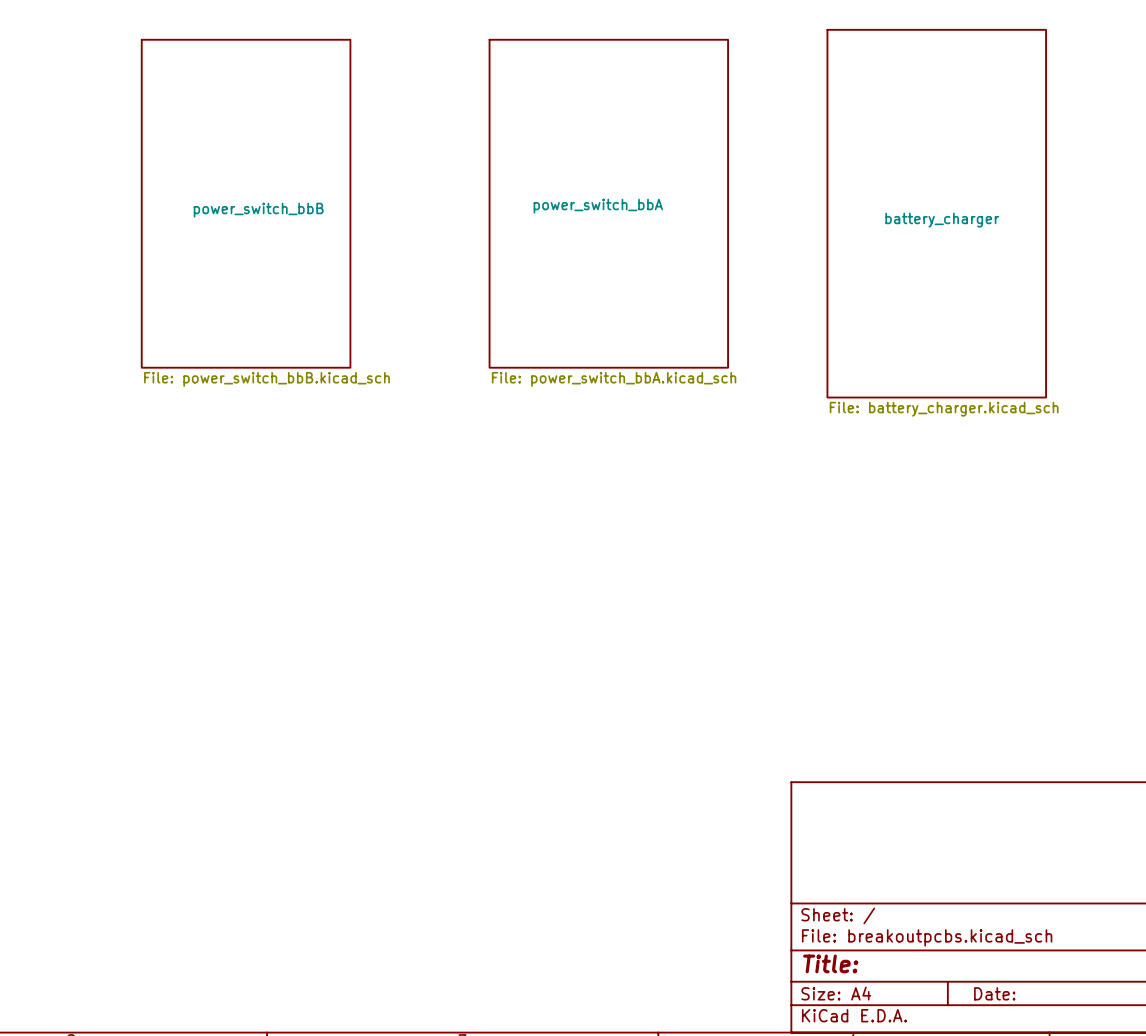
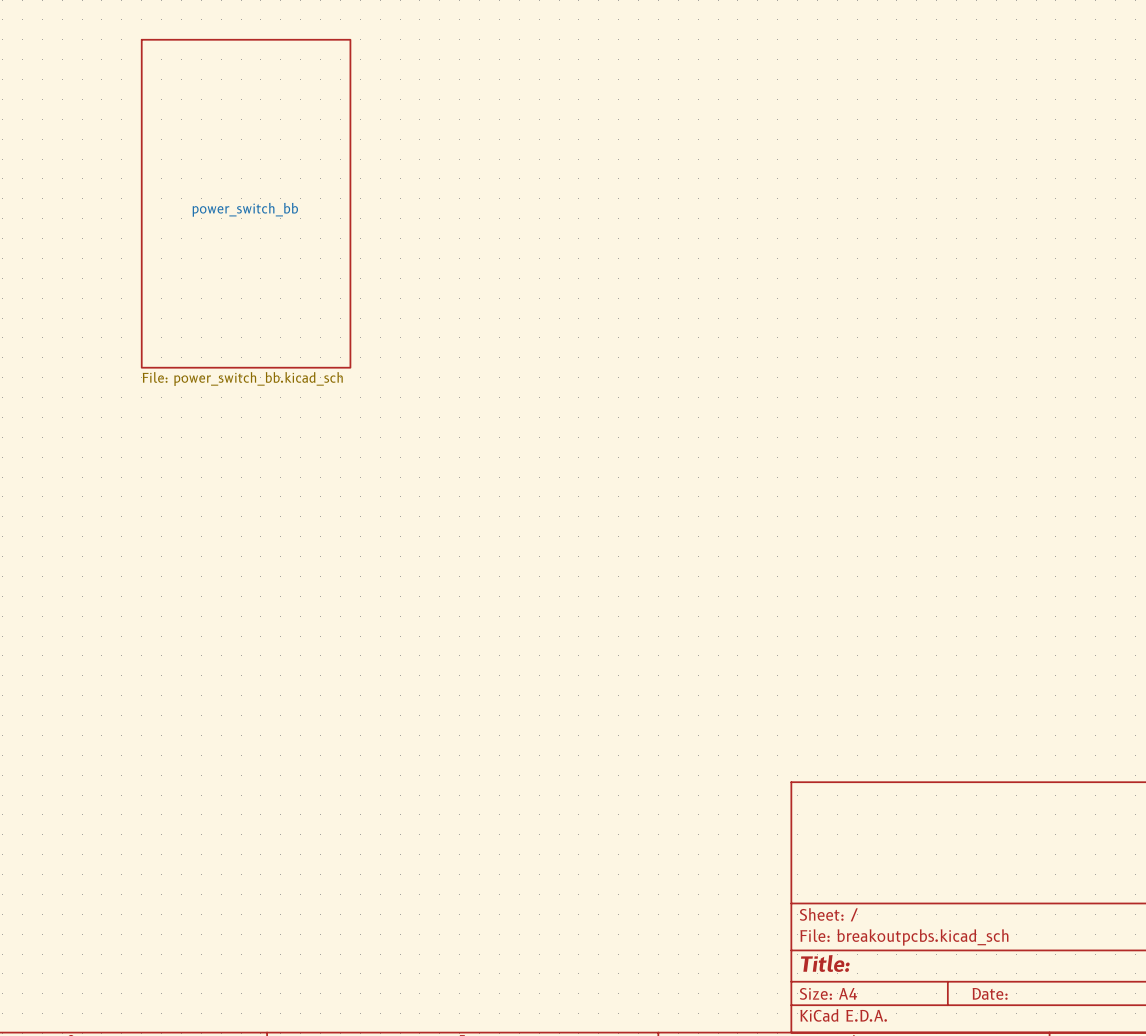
sheet power_switch_bbA: File: power_switch_bbA.kicad_sch (608, 203) -> none
sheet power_switch_bbB name: power_switch_bbB (258, 210) -> power_switch_bb (245, 209)
sheet battery_charger: File: battery_charger.kicad_sch (936, 213) -> none
sheet power_switch_bbB value: File: power_switch_bbB.kicad_sch (266, 379) -> File: power_switch_bb.kicad_sch (242, 379)

